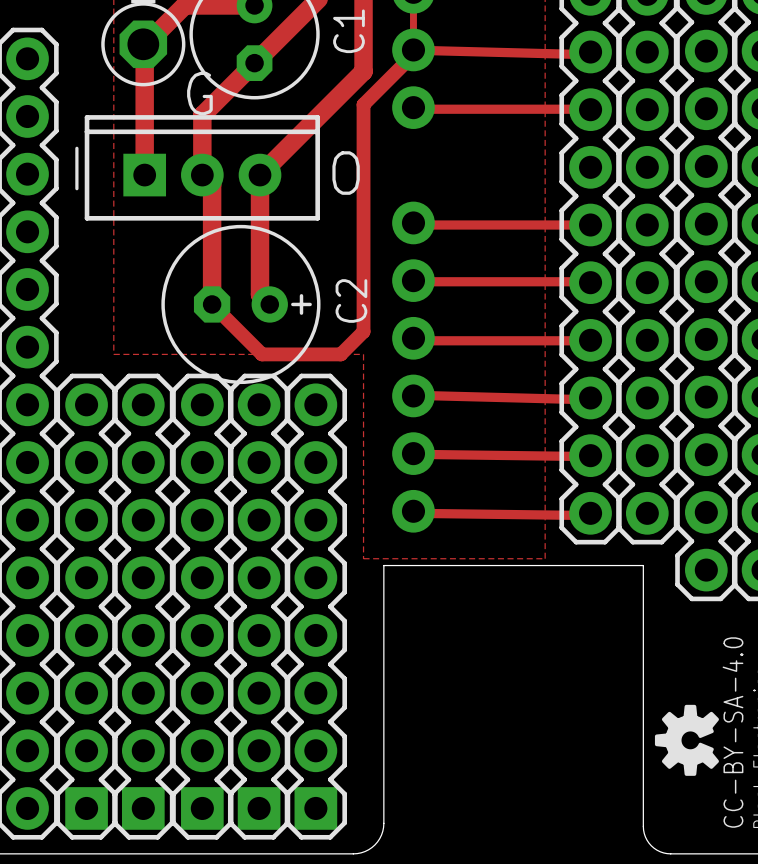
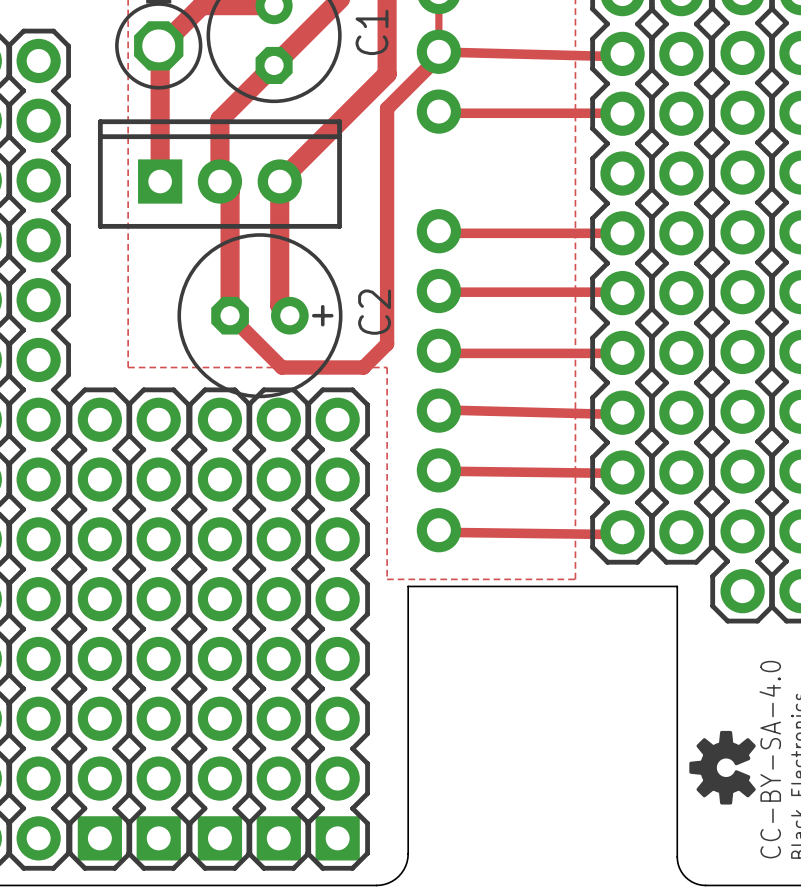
text: G (199, 93) -> none
text: I (76, 168) -> none
text: O (346, 173) -> none

